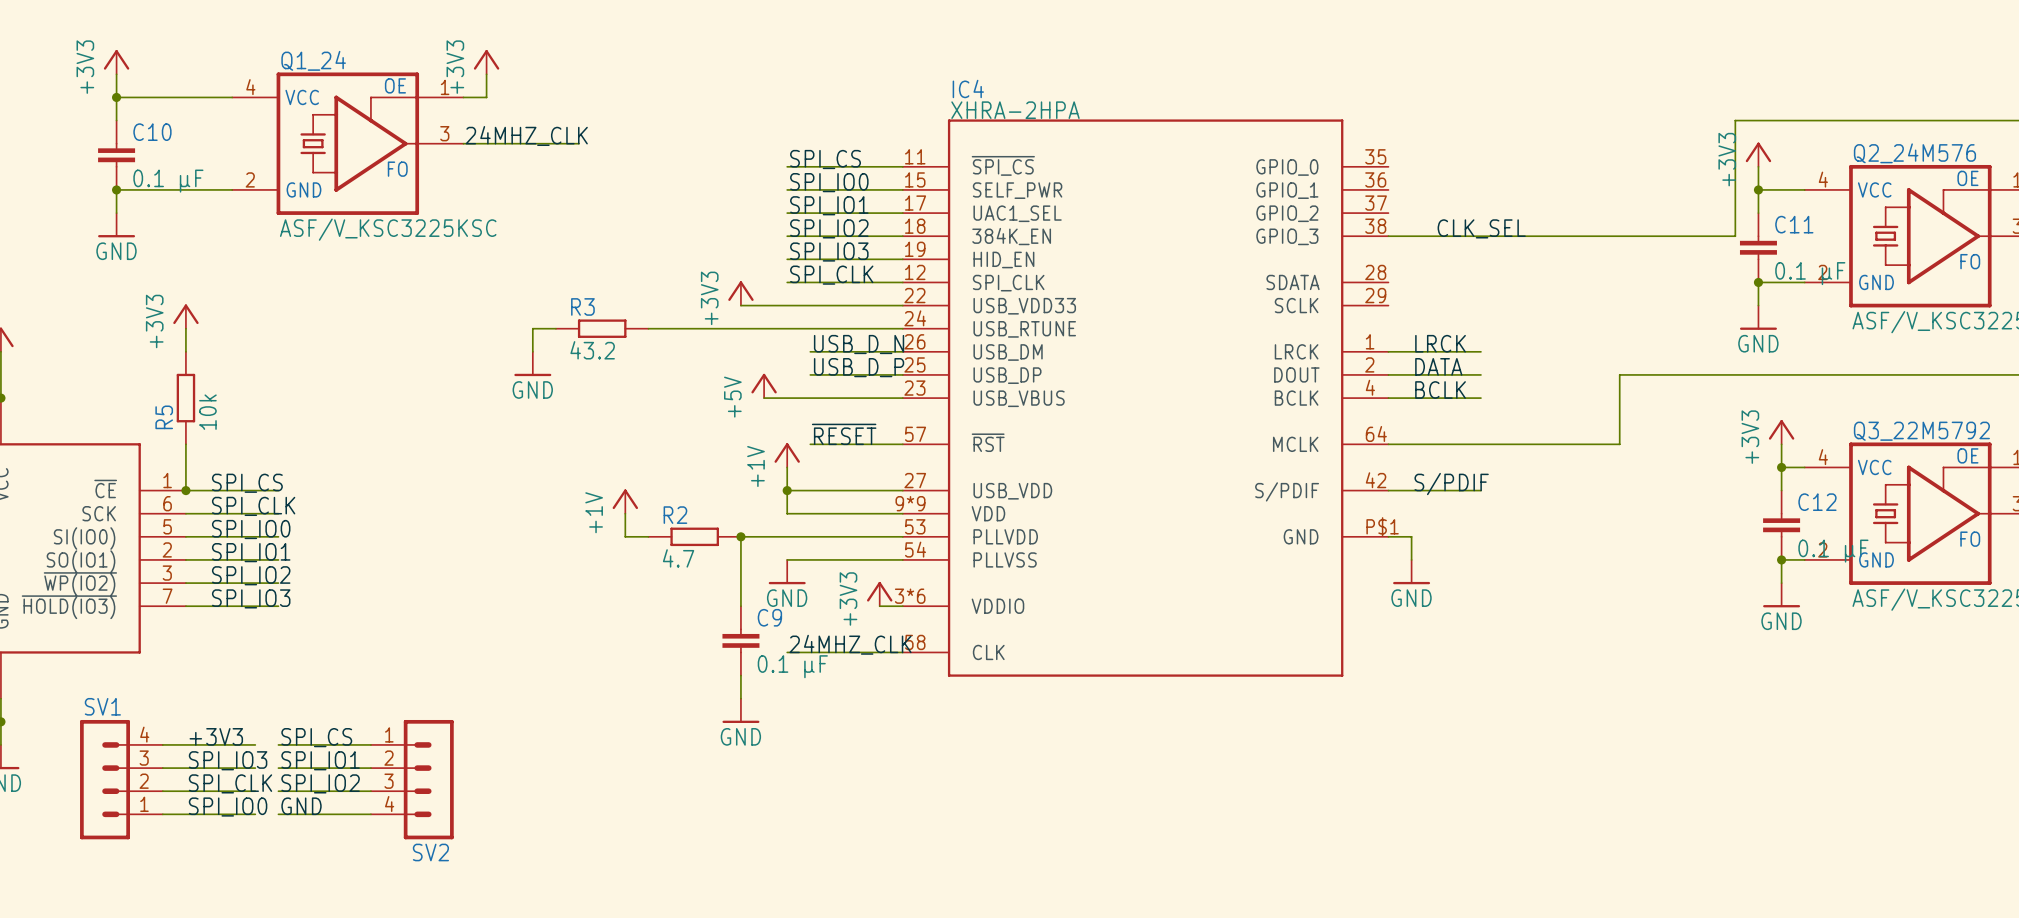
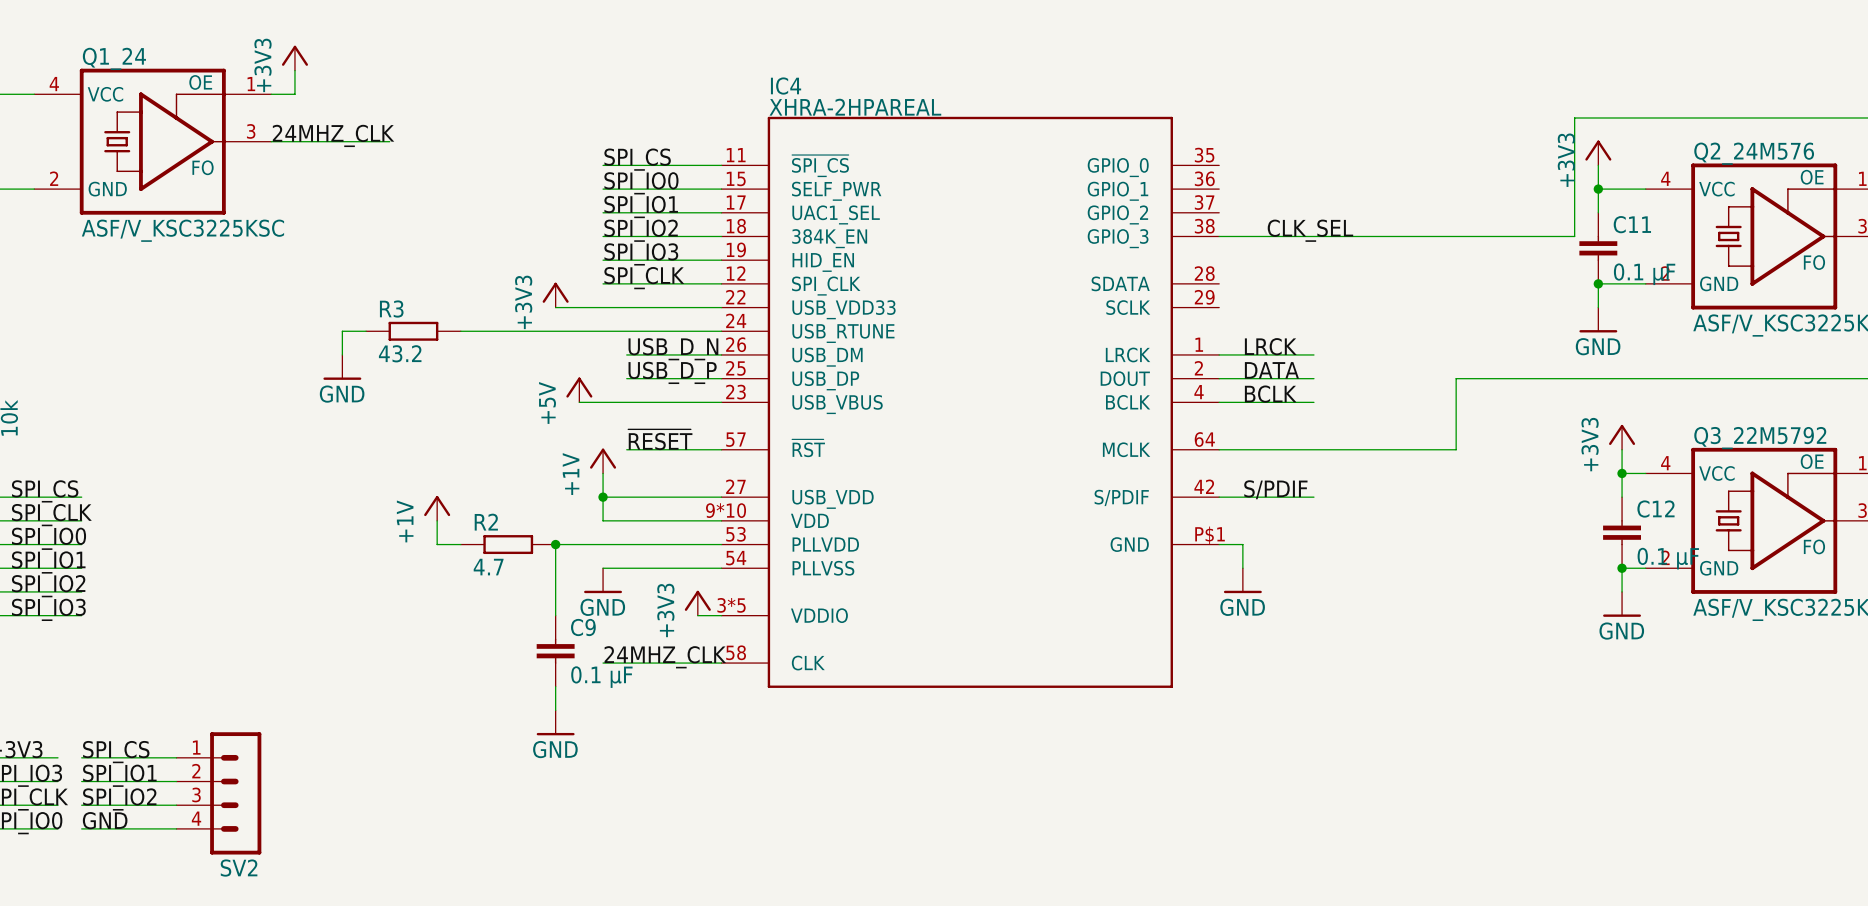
IC4 value: XHRA-2HPA (1015, 110) -> XHRA-2HPAREAL (855, 107)
IC4 pin number: 9*9 (910, 503) -> 9*10 (726, 510)
IC4 pin number: 3*6 (910, 596) -> 3*5 (731, 605)

